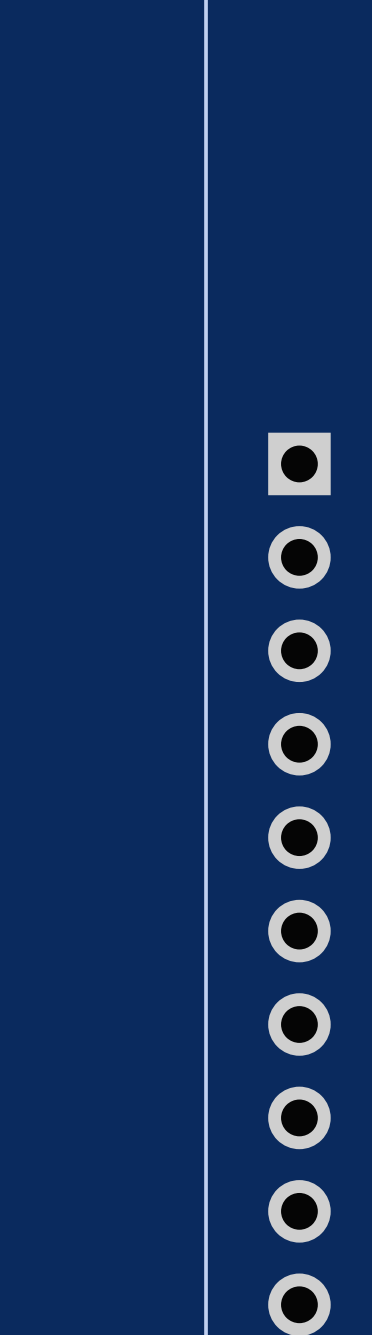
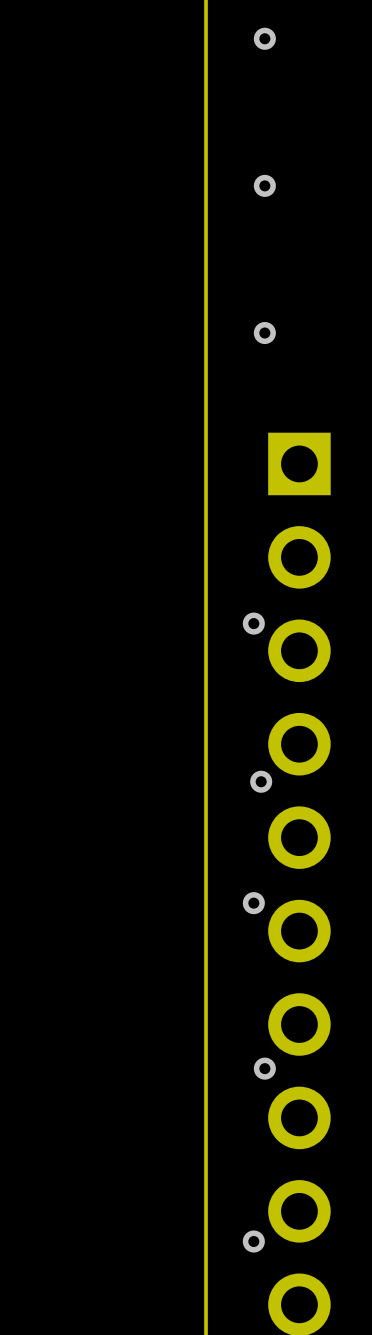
via: none -> (264, 38)
via: none -> (264, 185)
via: none -> (264, 333)
via: none -> (253, 623)
via: none -> (261, 781)
via: none -> (253, 903)
via: none -> (264, 1068)
via: none -> (253, 1241)

